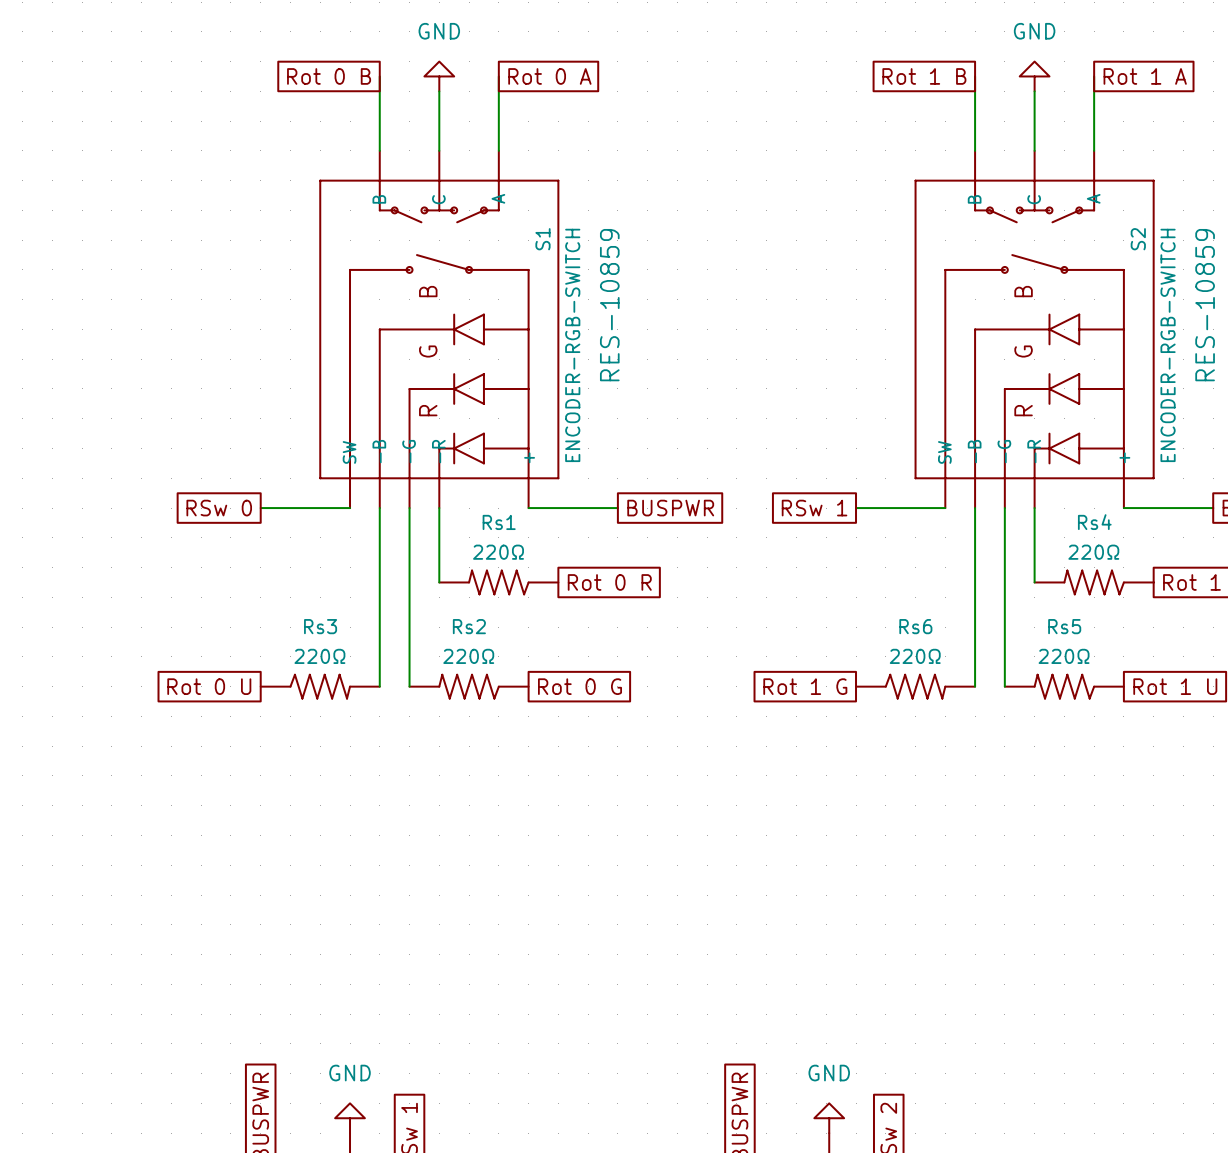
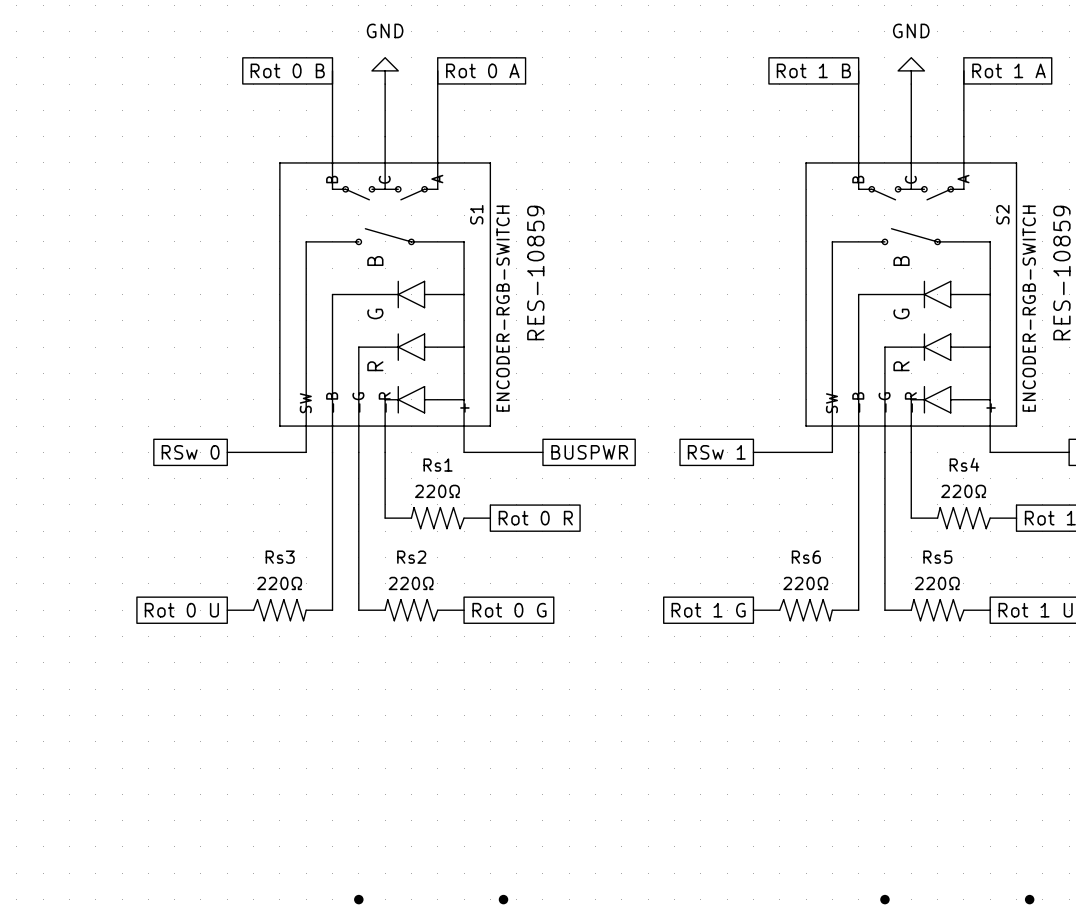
junction: none -> (358, 899)
junction: none -> (503, 899)
junction: none -> (884, 899)
junction: none -> (1029, 899)

